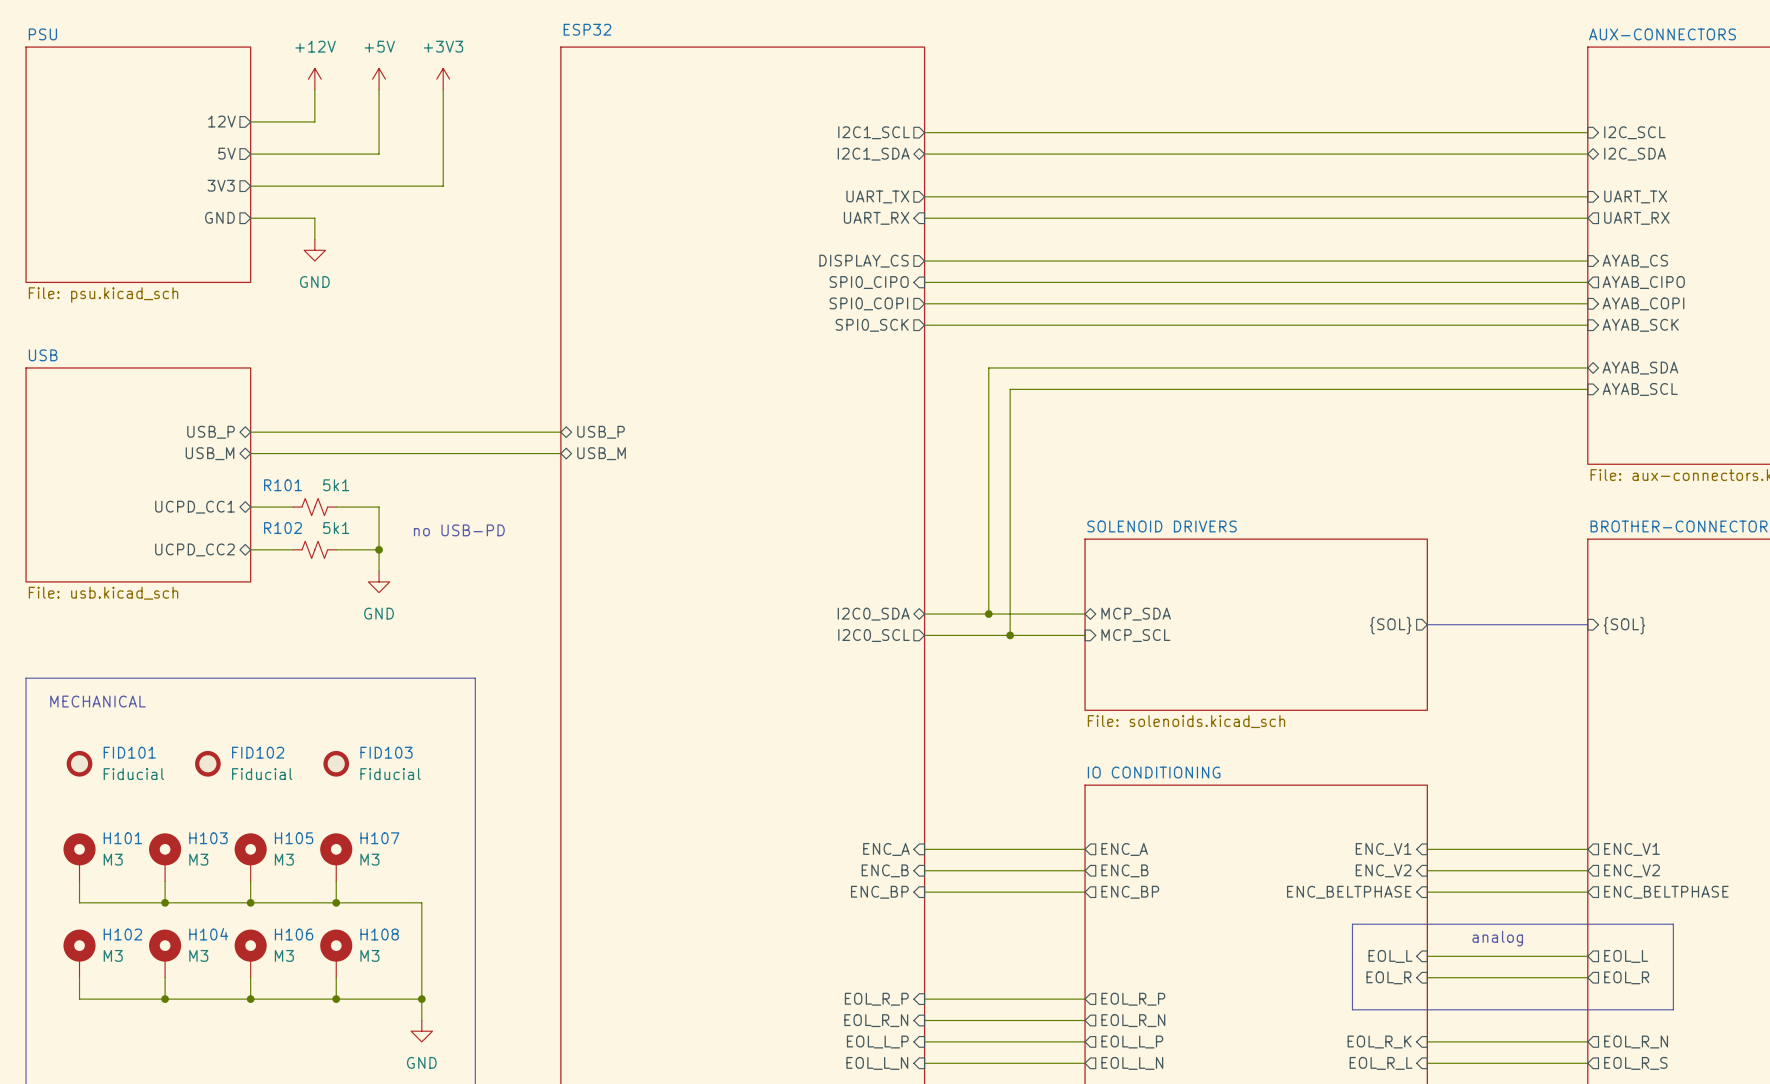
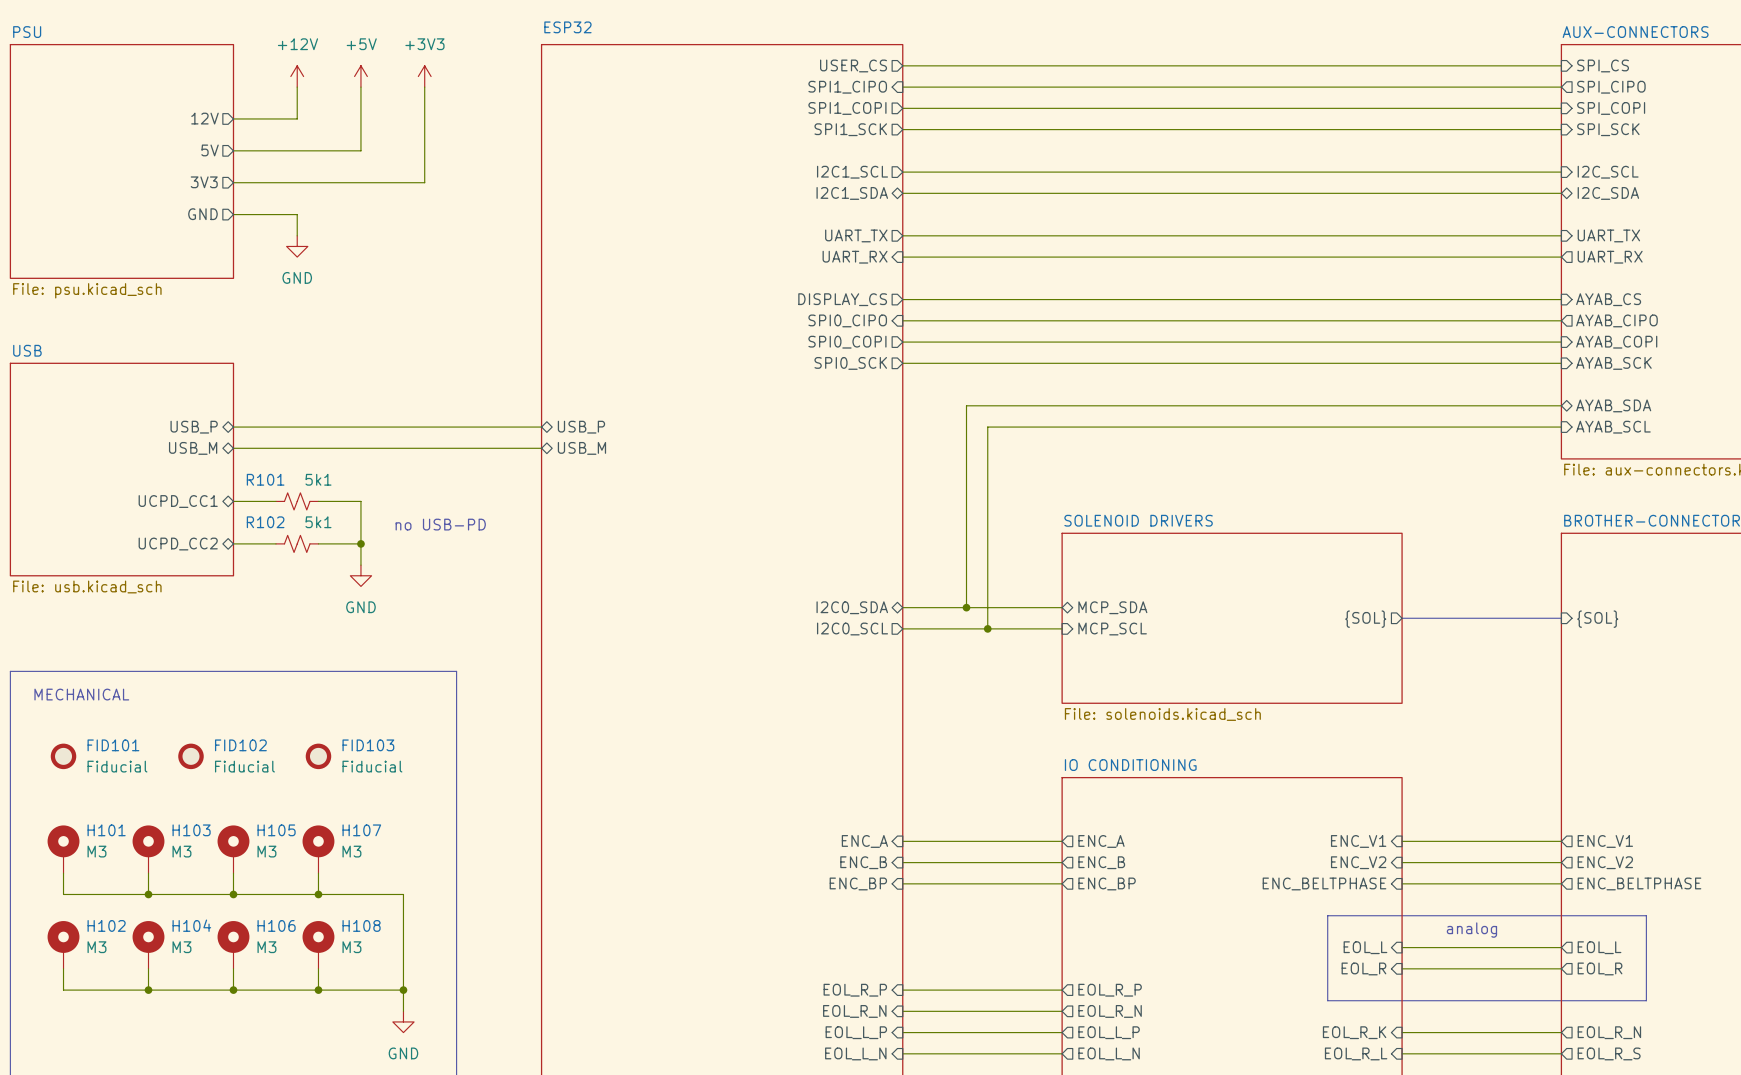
sheet pin: none -> USER_CS (853, 65)
wire: none -> (902, 65) (1561, 65)
sheet pin: none -> SPI_CS (1603, 65)
sheet pin: none -> SPI1_CIPO (847, 87)
wire: none -> (902, 87) (1561, 87)
sheet pin: none -> SPI_CIPO (1611, 87)
sheet pin: none -> SPI1_COPI (847, 108)
sheet pin: none -> SPI_COPI (1611, 108)
sheet pin: I2C1_SCL (873, 132) -> SPI1_SCK (850, 129)
sheet pin: I2C_SCL (1634, 132) -> SPI_SCK (1608, 129)
sheet pin shape: bidirectional (873, 154) -> output (852, 172)
sheet pin: I2C1_SDA (873, 154) -> I2C1_SCL (852, 172)
wire: (924, 154) (1587, 154) -> (902, 108) (1561, 108)
sheet pin shape: bidirectional (1635, 154) -> input (1608, 172)
sheet pin: I2C_SDA (1635, 154) -> I2C_SCL (1608, 172)
sheet pin shape: output (877, 196) -> bidirectional (852, 193)
sheet pin: UART_TX (877, 196) -> I2C1_SDA (852, 193)
sheet pin shape: input (1635, 196) -> bidirectional (1608, 193)
sheet pin: UART_TX (1635, 196) -> I2C_SDA (1608, 193)
sheet pin shape: input (876, 218) -> output (856, 235)
sheet pin: UART_RX (876, 218) -> UART_TX (856, 235)
wire: (924, 218) (1587, 218) -> (902, 172) (1561, 172)
sheet pin shape: output (1636, 218) -> input (1608, 235)
sheet pin: UART_RX (1636, 218) -> UART_TX (1608, 235)
sheet pin shape: output (864, 261) -> input (855, 257)
sheet pin: DISPLAY_CS (864, 261) -> UART_RX (855, 257)
sheet pin shape: input (1635, 261) -> output (1610, 257)
sheet pin: AYAB_CS (1635, 261) -> UART_RX (1610, 257)
sheet pin: SPI0_CIPO (869, 282) -> none
wire: (924, 282) (1587, 282) -> (902, 235) (1561, 235)
sheet pin: AYAB_CIPO (1643, 282) -> none
sheet pin: SPI0_COPI (868, 303) -> DISPLAY_CS (842, 299)
sheet pin: AYAB_COPI (1643, 303) -> AYAB_CS (1608, 299)
sheet pin shape: output (872, 325) -> input (847, 320)
sheet pin: SPI0_SCK (872, 325) -> SPI0_CIPO (847, 320)
sheet pin shape: input (1640, 325) -> output (1616, 320)
sheet pin: AYAB_SCK (1640, 325) -> AYAB_CIPO (1616, 320)
sheet pin: none -> SPI0_COPI (847, 342)
wire: none -> (902, 342) (1561, 342)
sheet pin: none -> AYAB_COPI (1616, 342)
wire: (988, 367) (988, 410) -> (966, 363) (902, 363)
sheet pin: none -> SPI0_SCK (850, 363)
sheet pin shape: bidirectional (1640, 368) -> input (1613, 363)
sheet pin: AYAB_SDA (1640, 368) -> AYAB_SCK (1613, 363)
wire: (1587, 389) (1010, 389) (1010, 432) -> (1561, 427) (987, 427)
sheet pin position: AYAB_SCL (1640, 389) -> AYAB_SCL (1613, 427)
wire: none -> (966, 405) (1561, 405)
sheet pin: none -> AYAB_SDA (1613, 405)

